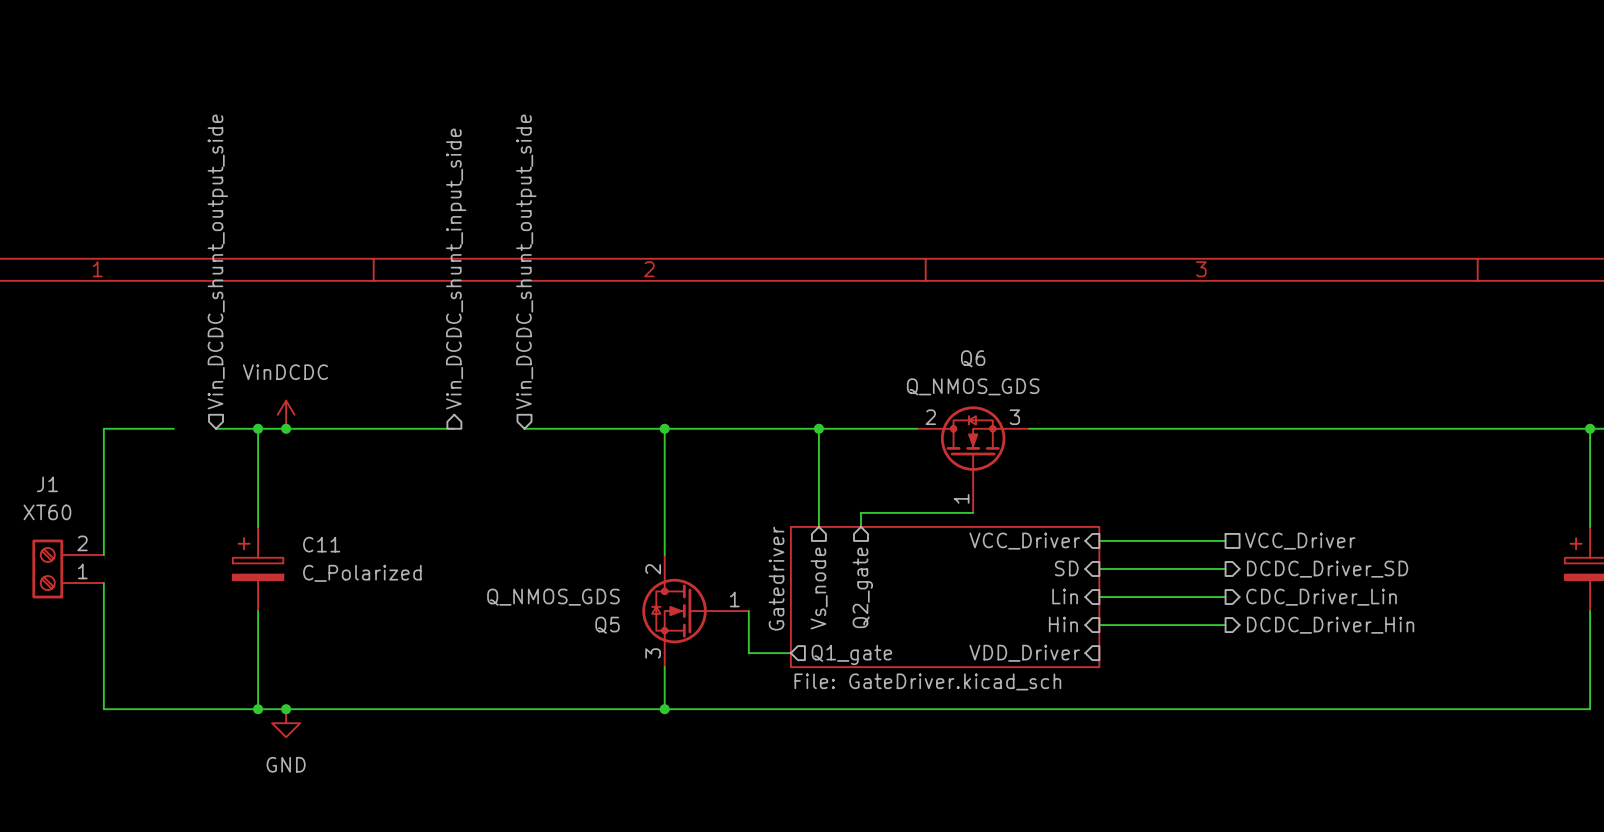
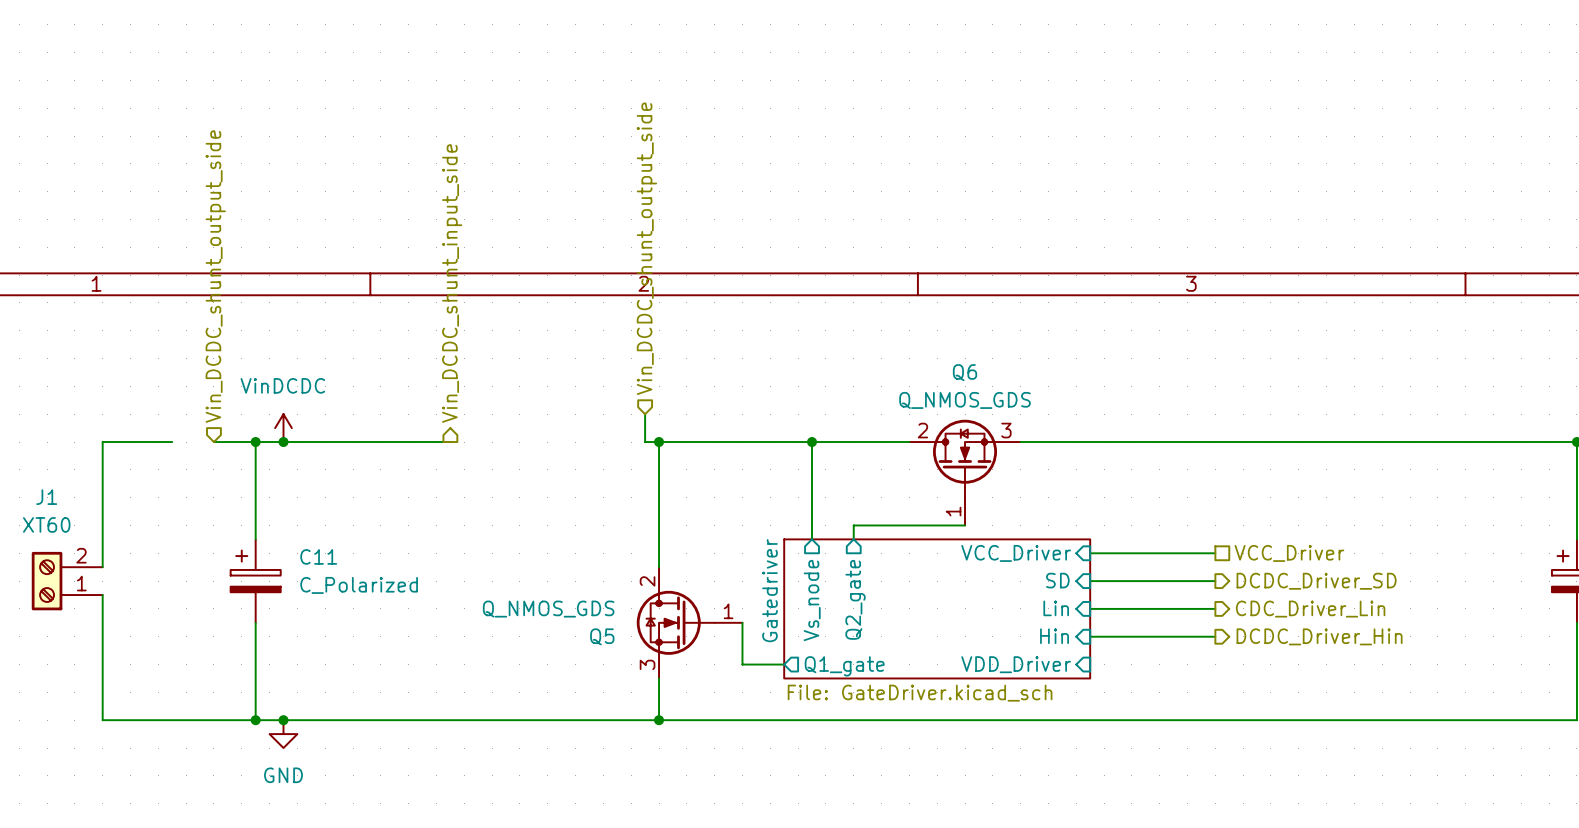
hierarchical label position: Vin_DCDC_shunt_output_side (526, 261) -> Vin_DCDC_shunt_output_side (646, 248)
wire: (524, 428) (650, 428) -> (645, 414) (645, 442)

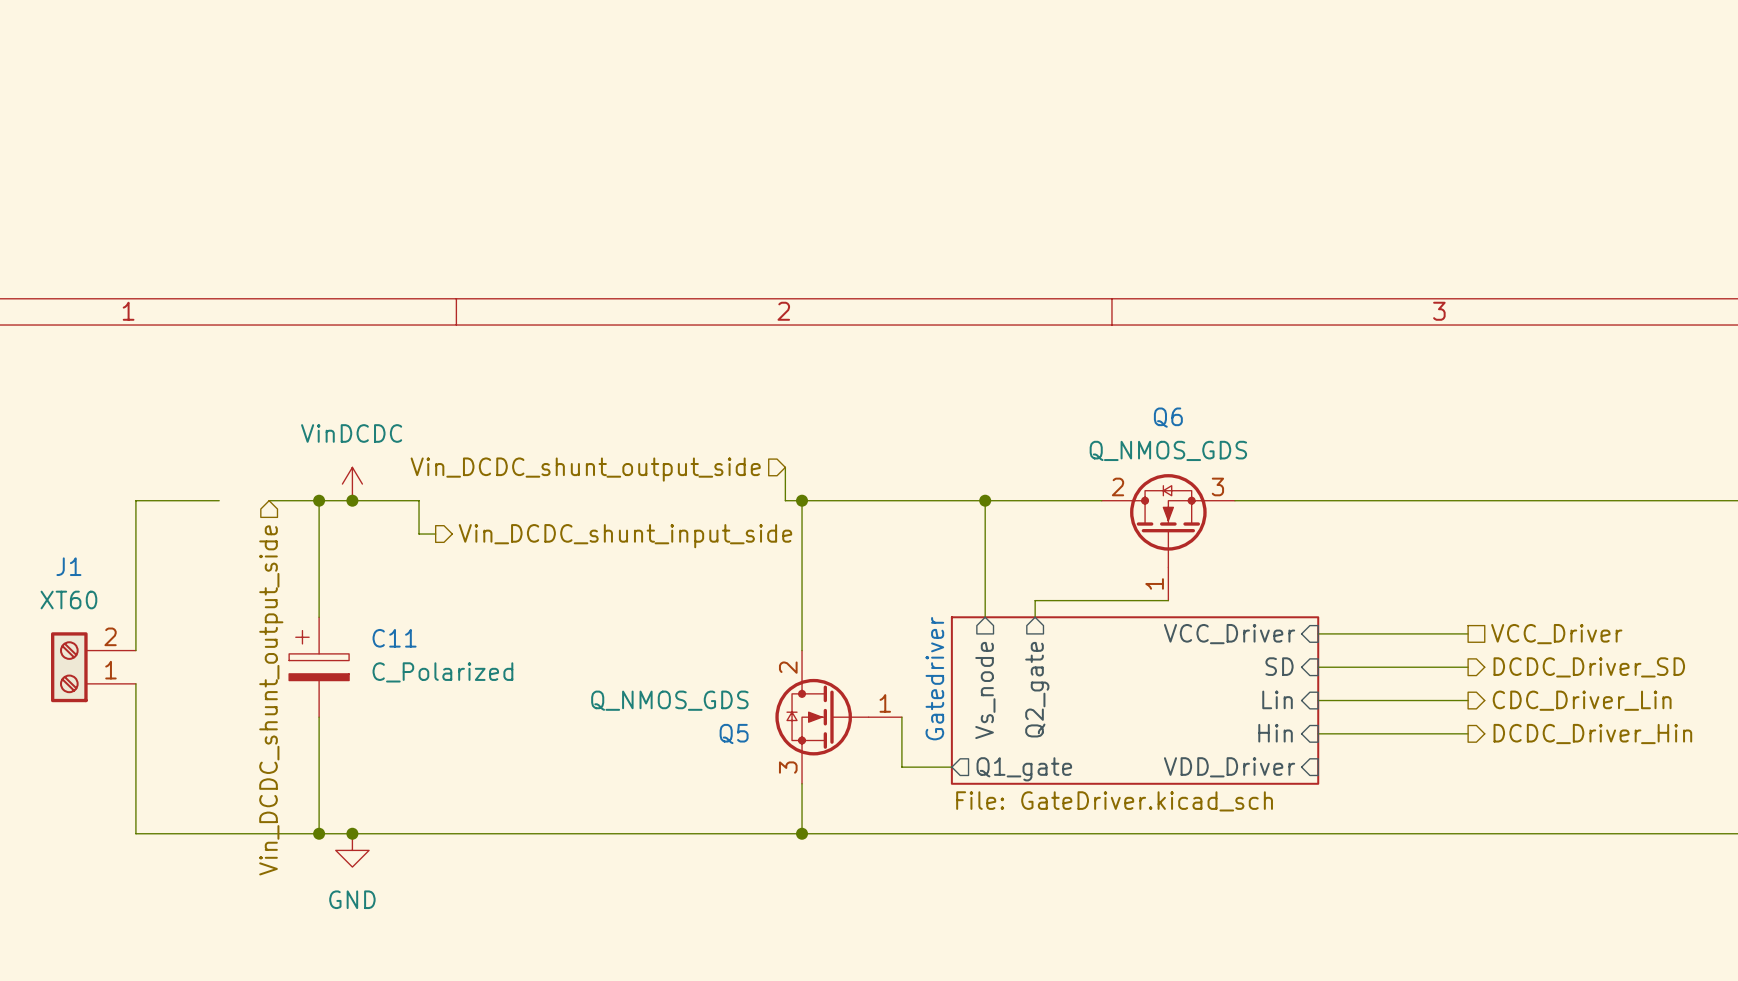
hierarchical label rotation: 0° (646, 248) -> 90° counterclockwise (585, 469)
hierarchical label rotation: 0° (215, 276) -> 180° (271, 700)
hierarchical label position: Vin_DCDC_shunt_output_side (215, 276) -> Vin_DCDC_shunt_output_side (271, 700)
hierarchical label rotation: 0° (452, 283) -> 90° clockwise (625, 536)
wire: (339, 442) (450, 442) -> (419, 500) (419, 534) (435, 534)

